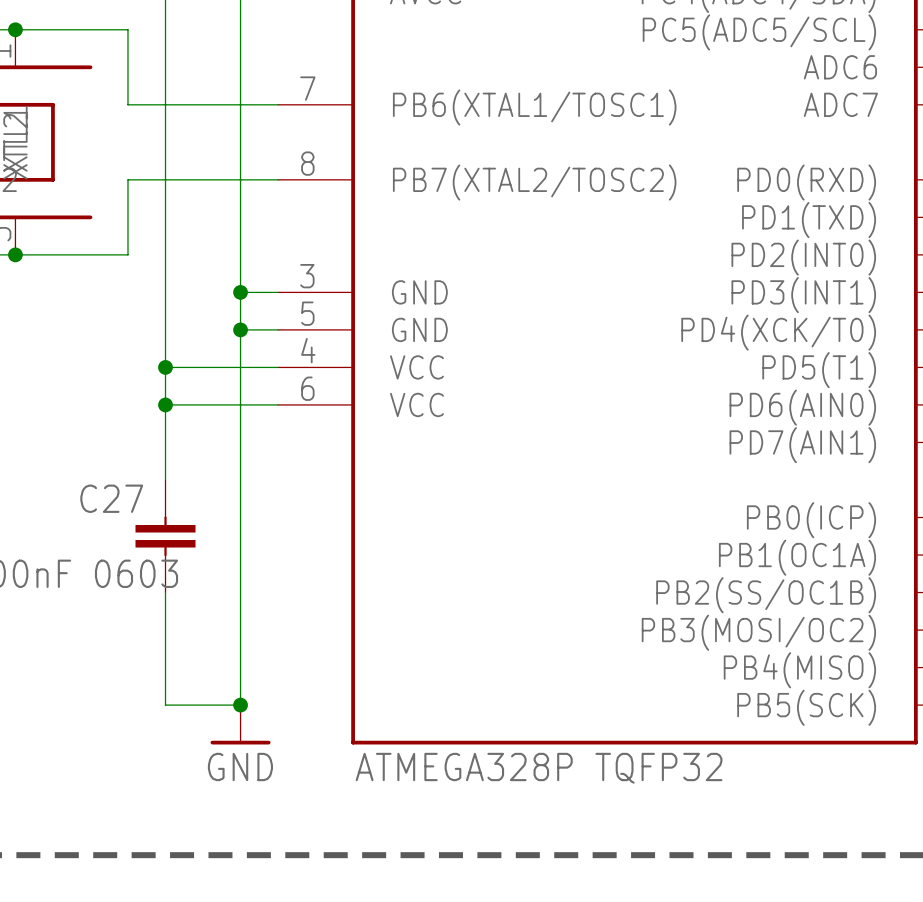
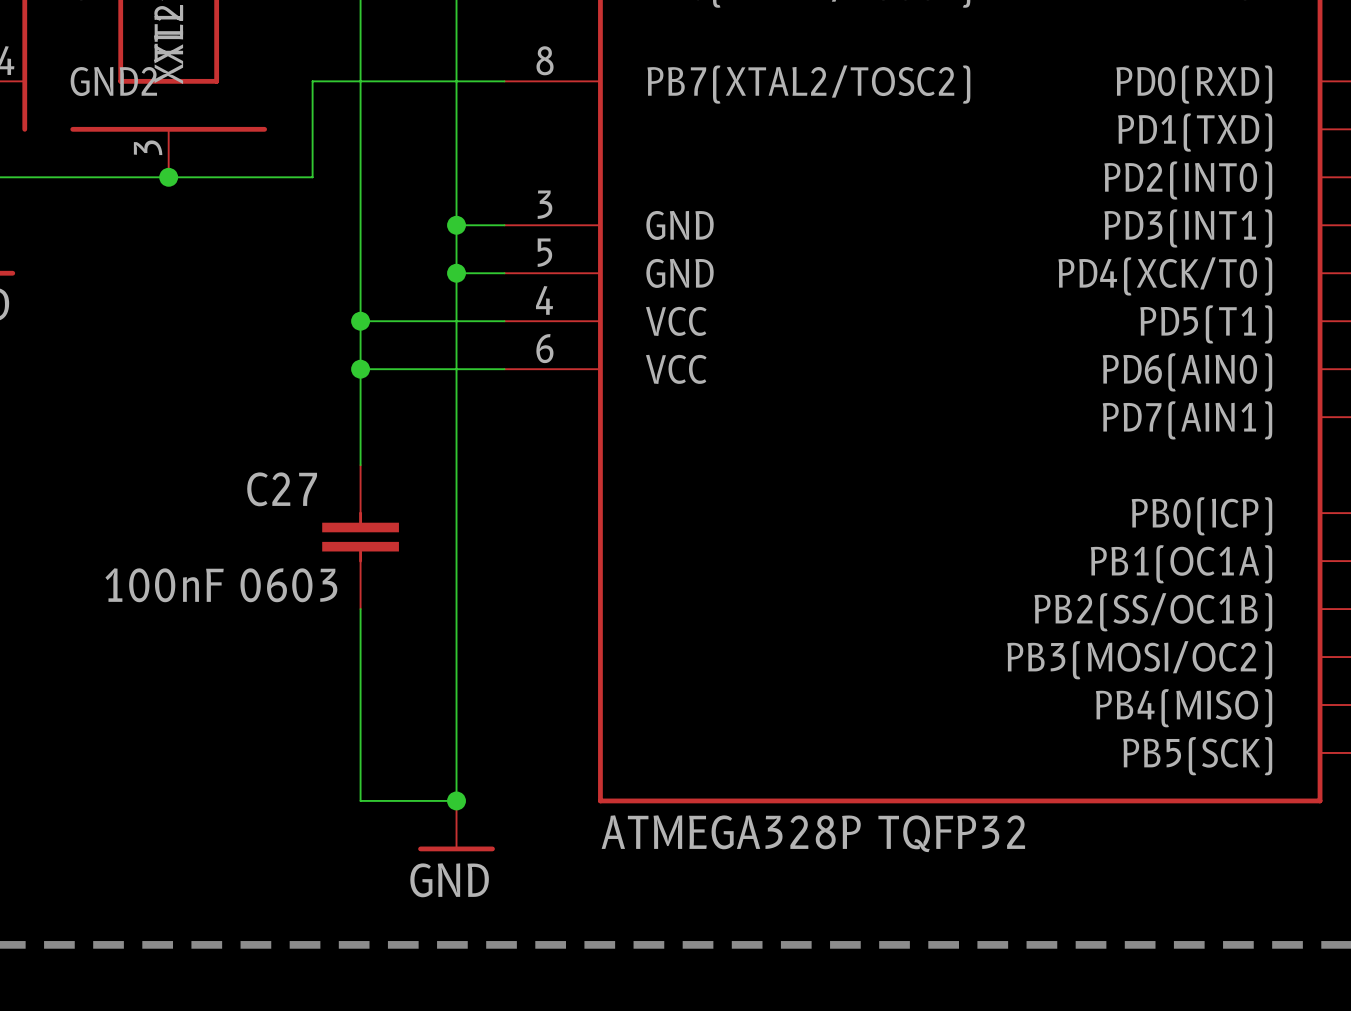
wire: (165, 705) (240, 705) -> (360, 752) (360, 800) (456, 800) (456, 752)
junction position: (240, 705) -> (456, 800)
power symbol position: GND (240, 724) -> GND (456, 826)

